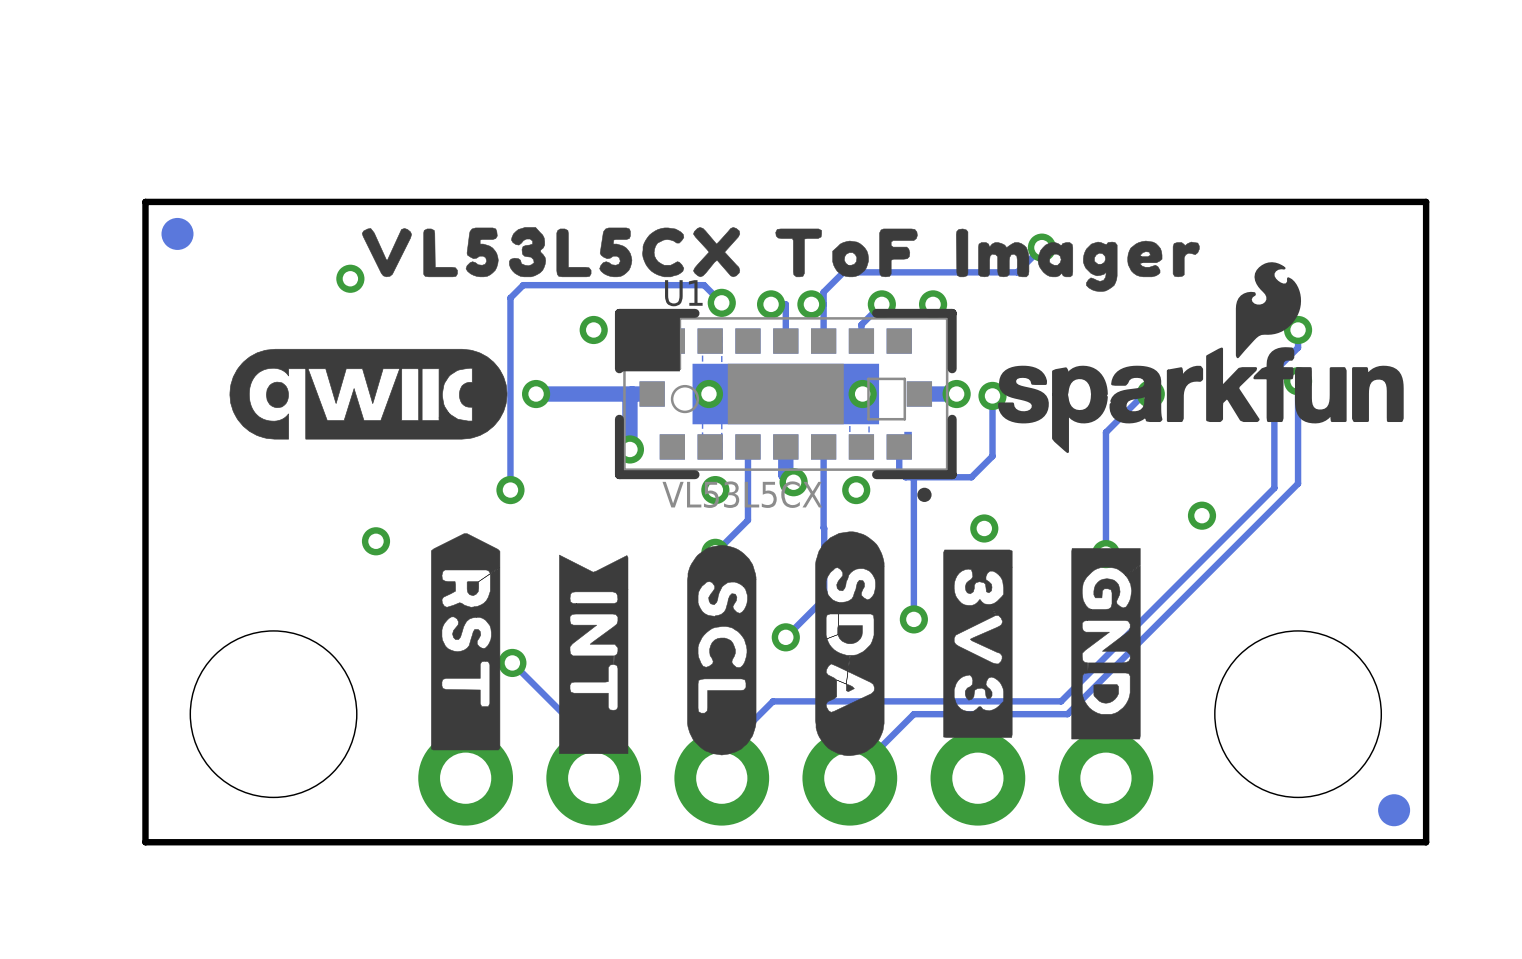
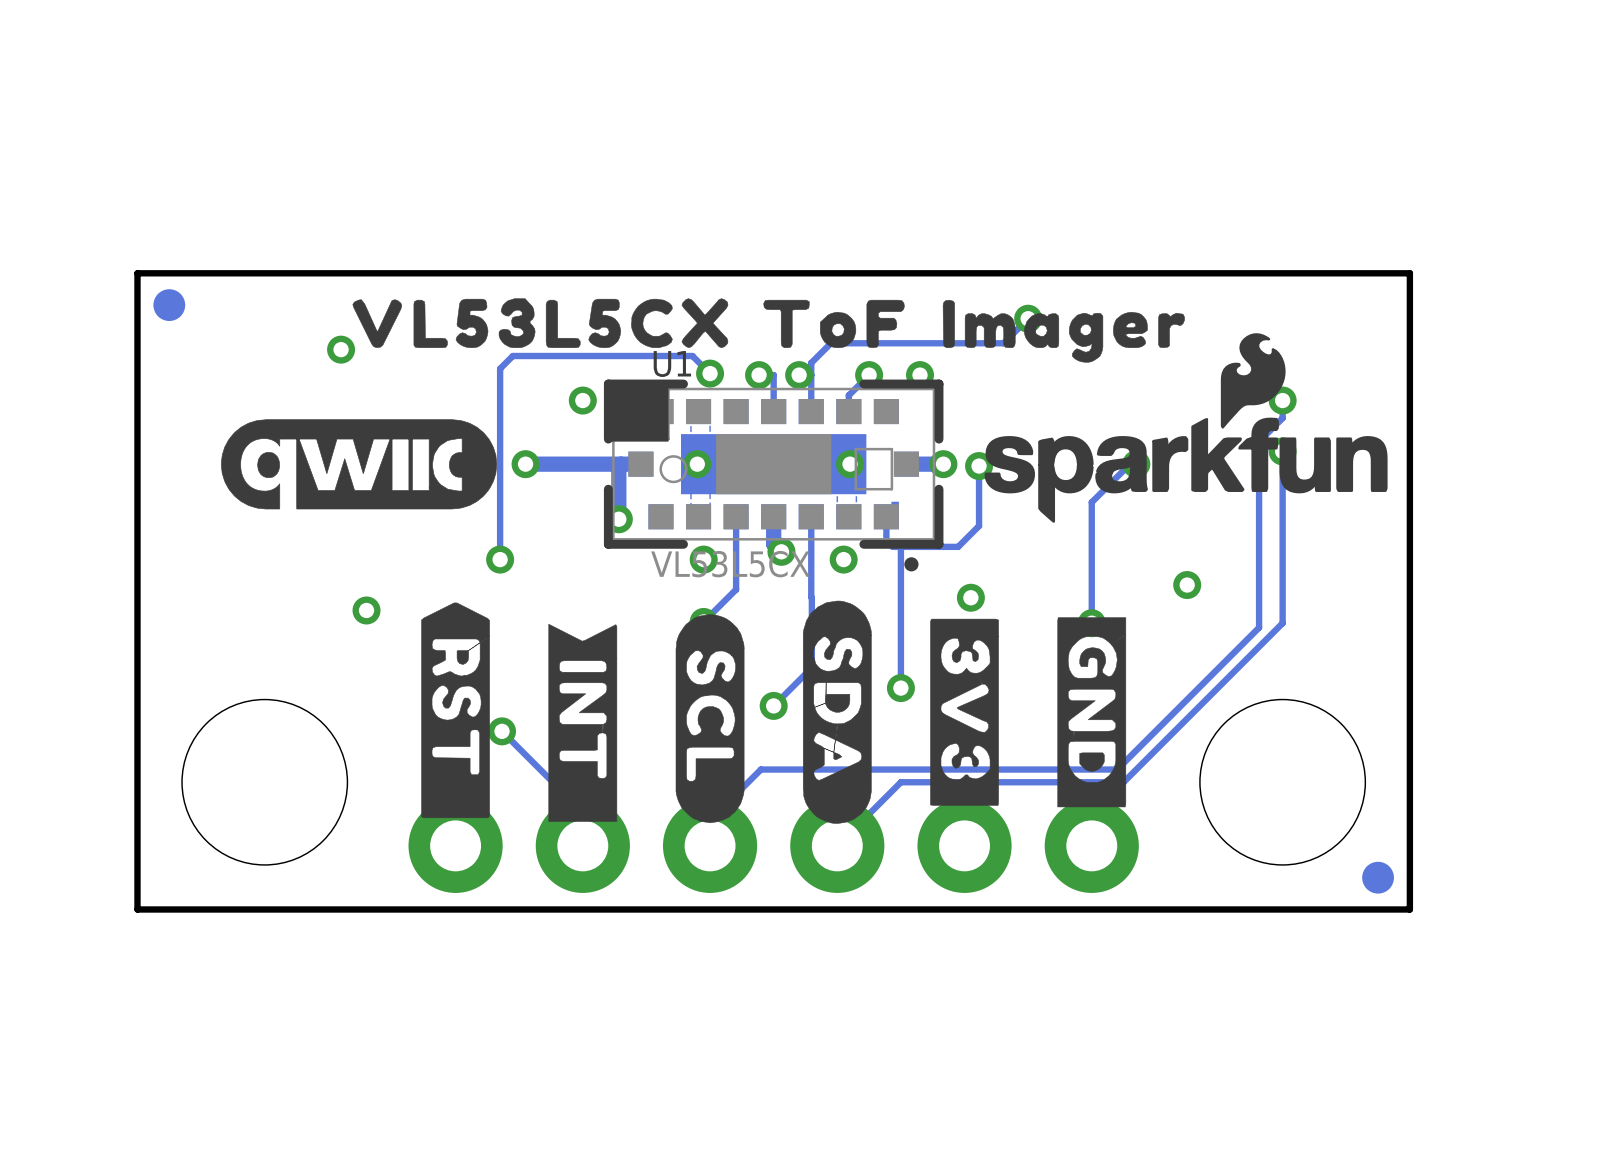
track: (1298, 483) (1067, 714) -> (1282, 553) (1282, 623) (1123, 782) (1053, 782)
track: (1274, 488) (1061, 701) -> (1259, 557) (1259, 627) (1117, 769) (1047, 769)

